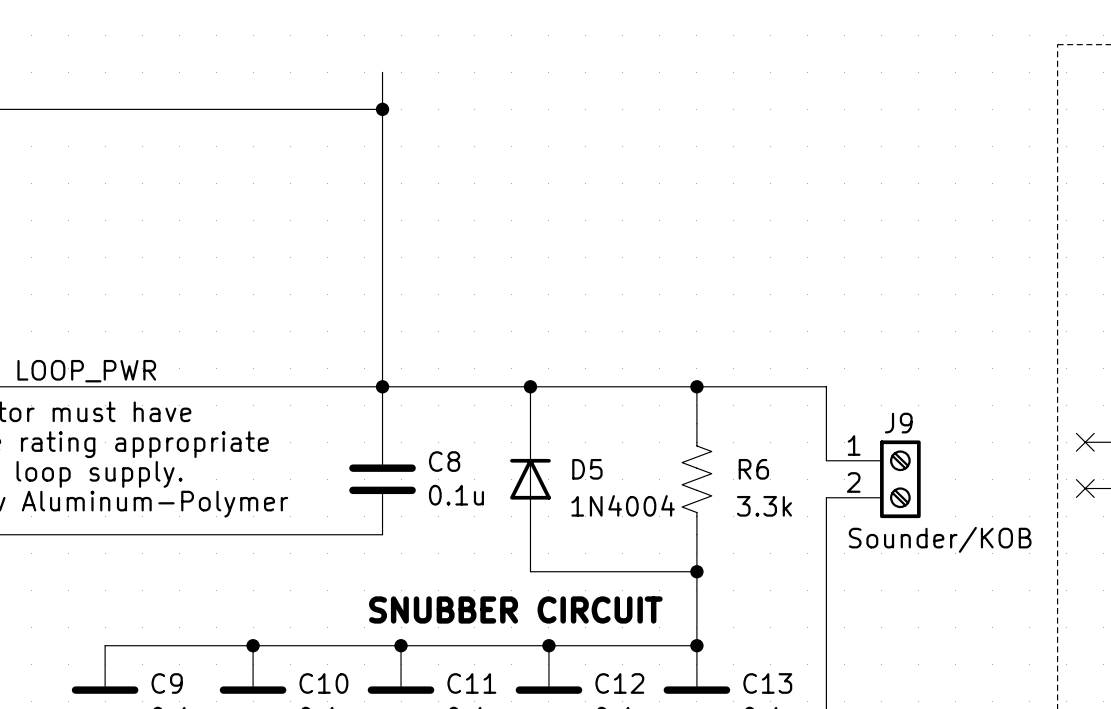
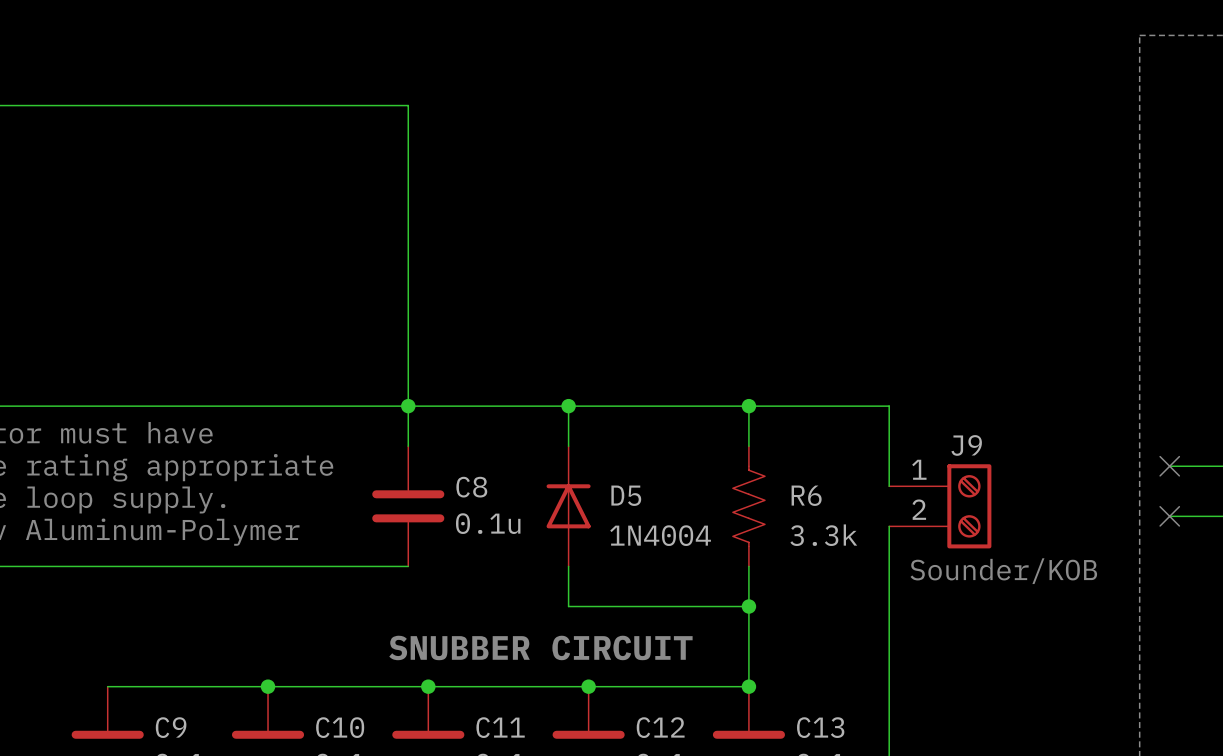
wire: (382, 72) (382, 109) -> none
junction: (382, 109) -> none
label: LOOP_PWR (86, 371) -> none

